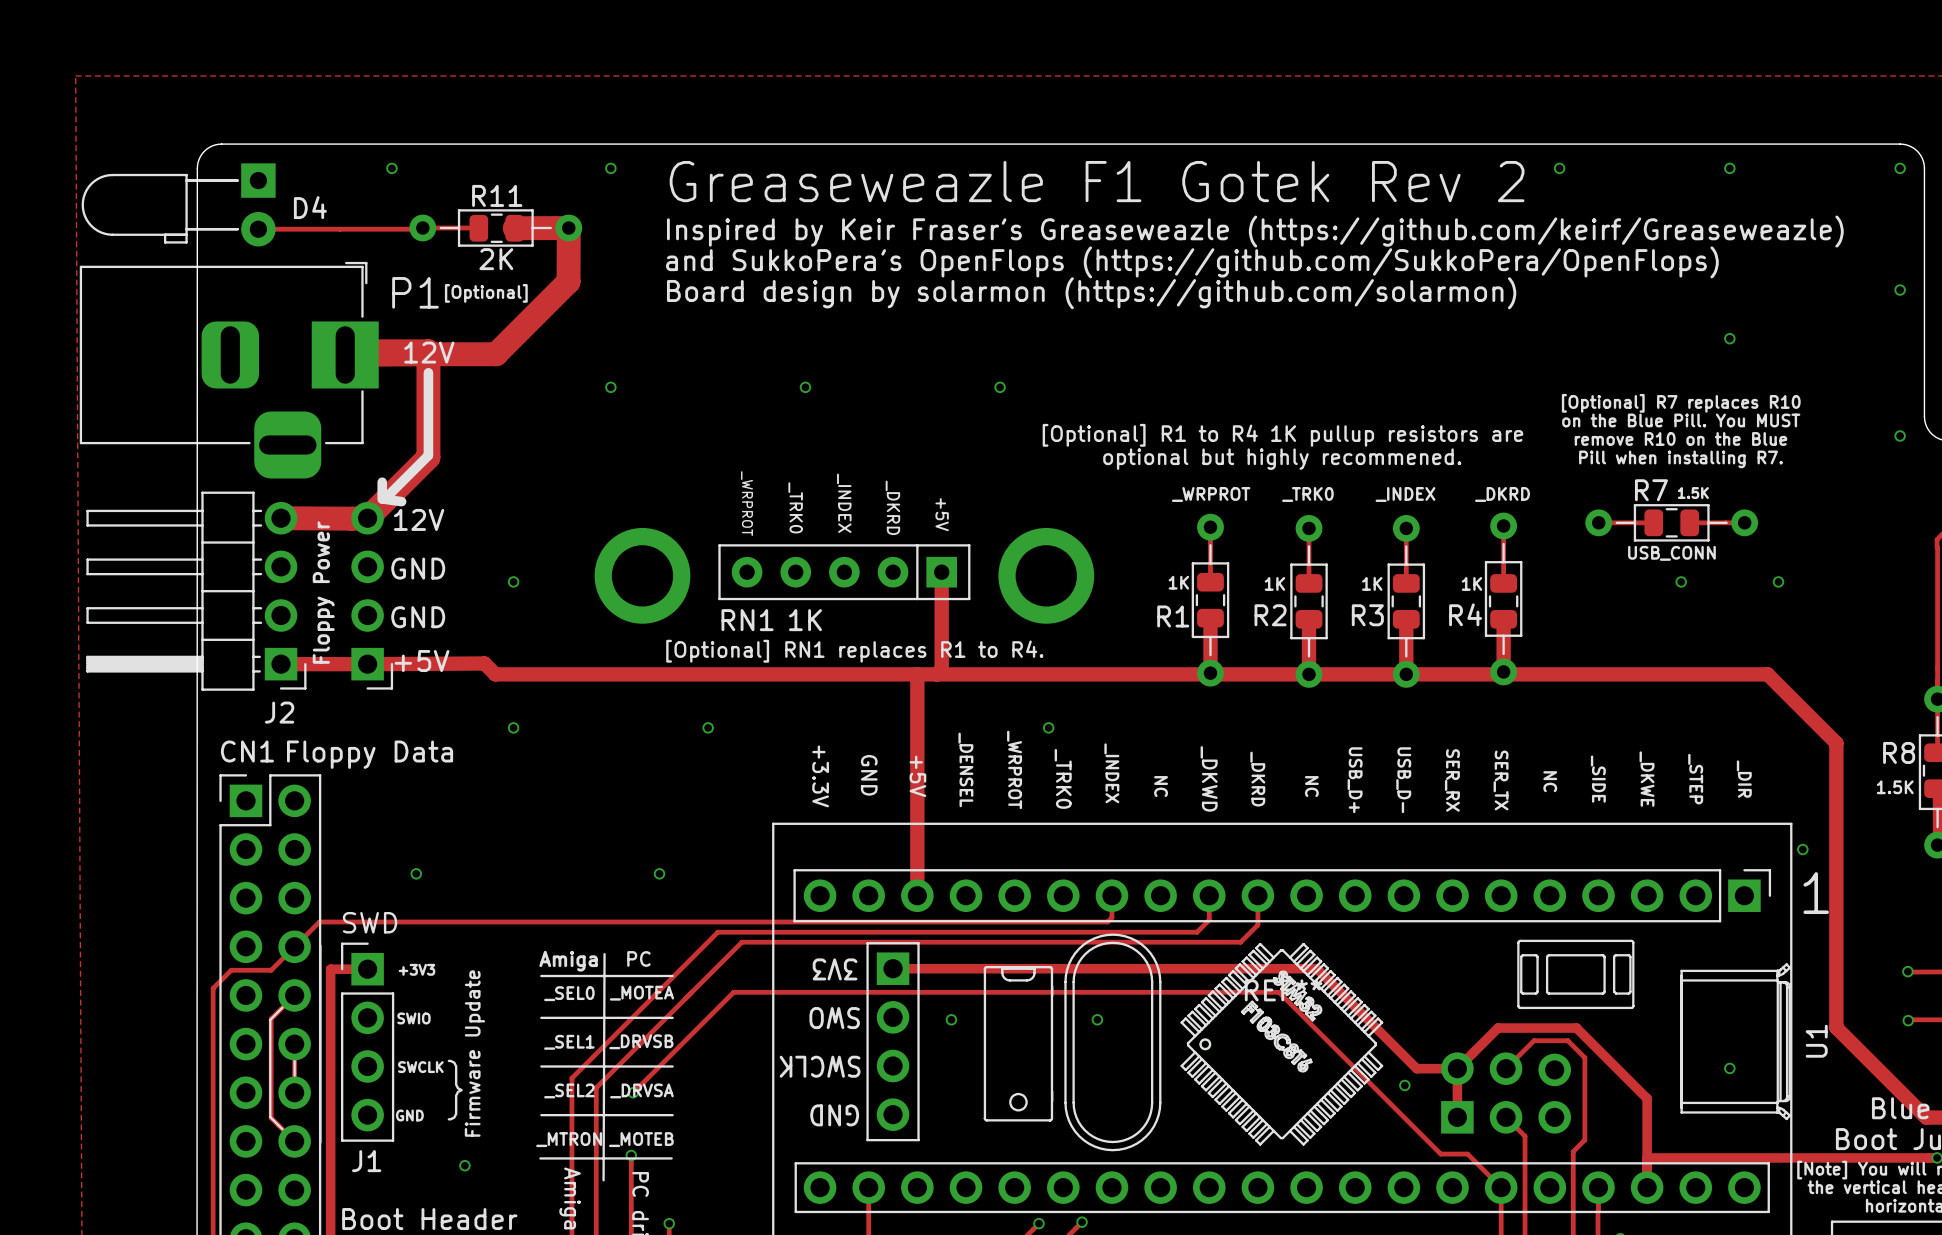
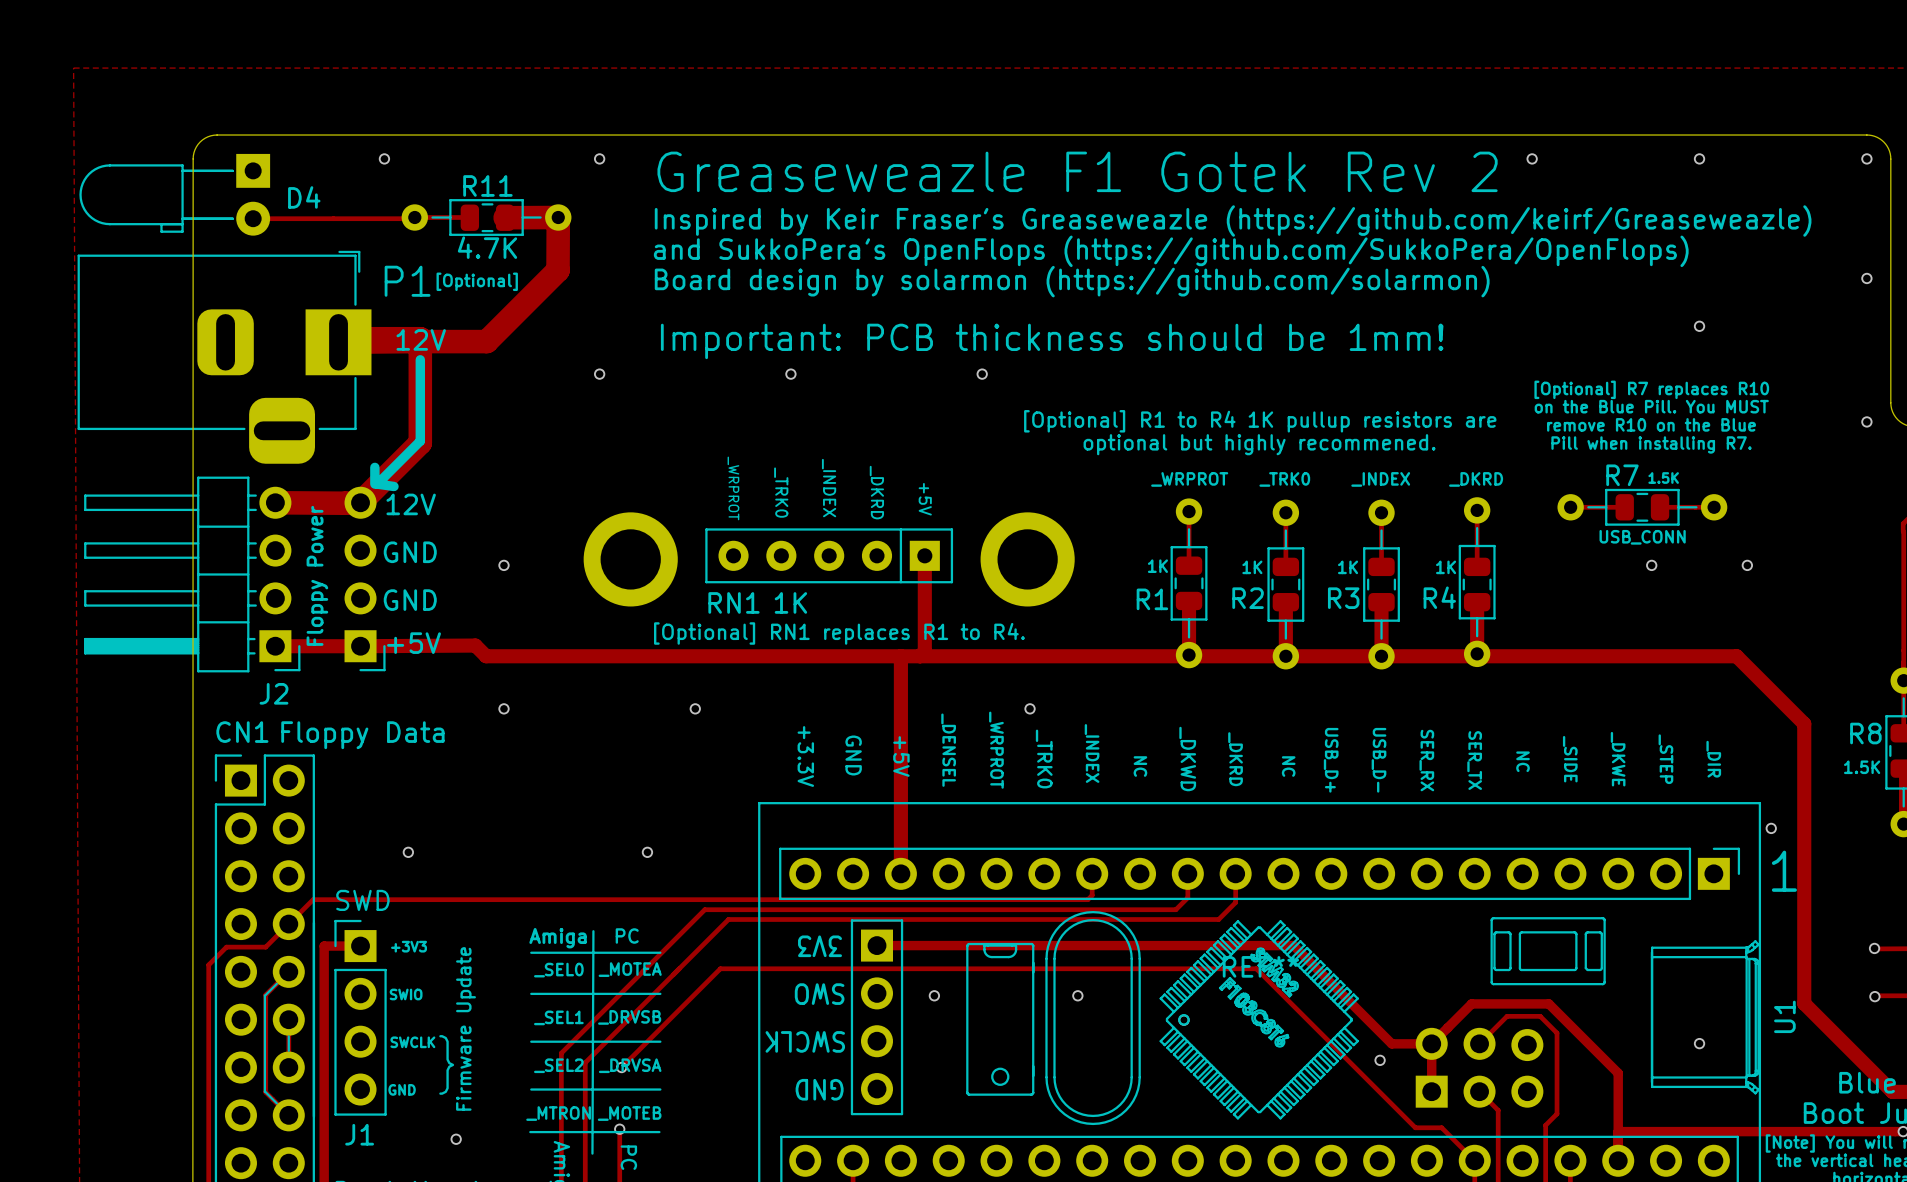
R11 value: 2K (496, 259) -> 4.7K (487, 247)
text: none -> Important: PCB thickness should be 1mm! (1052, 341)

